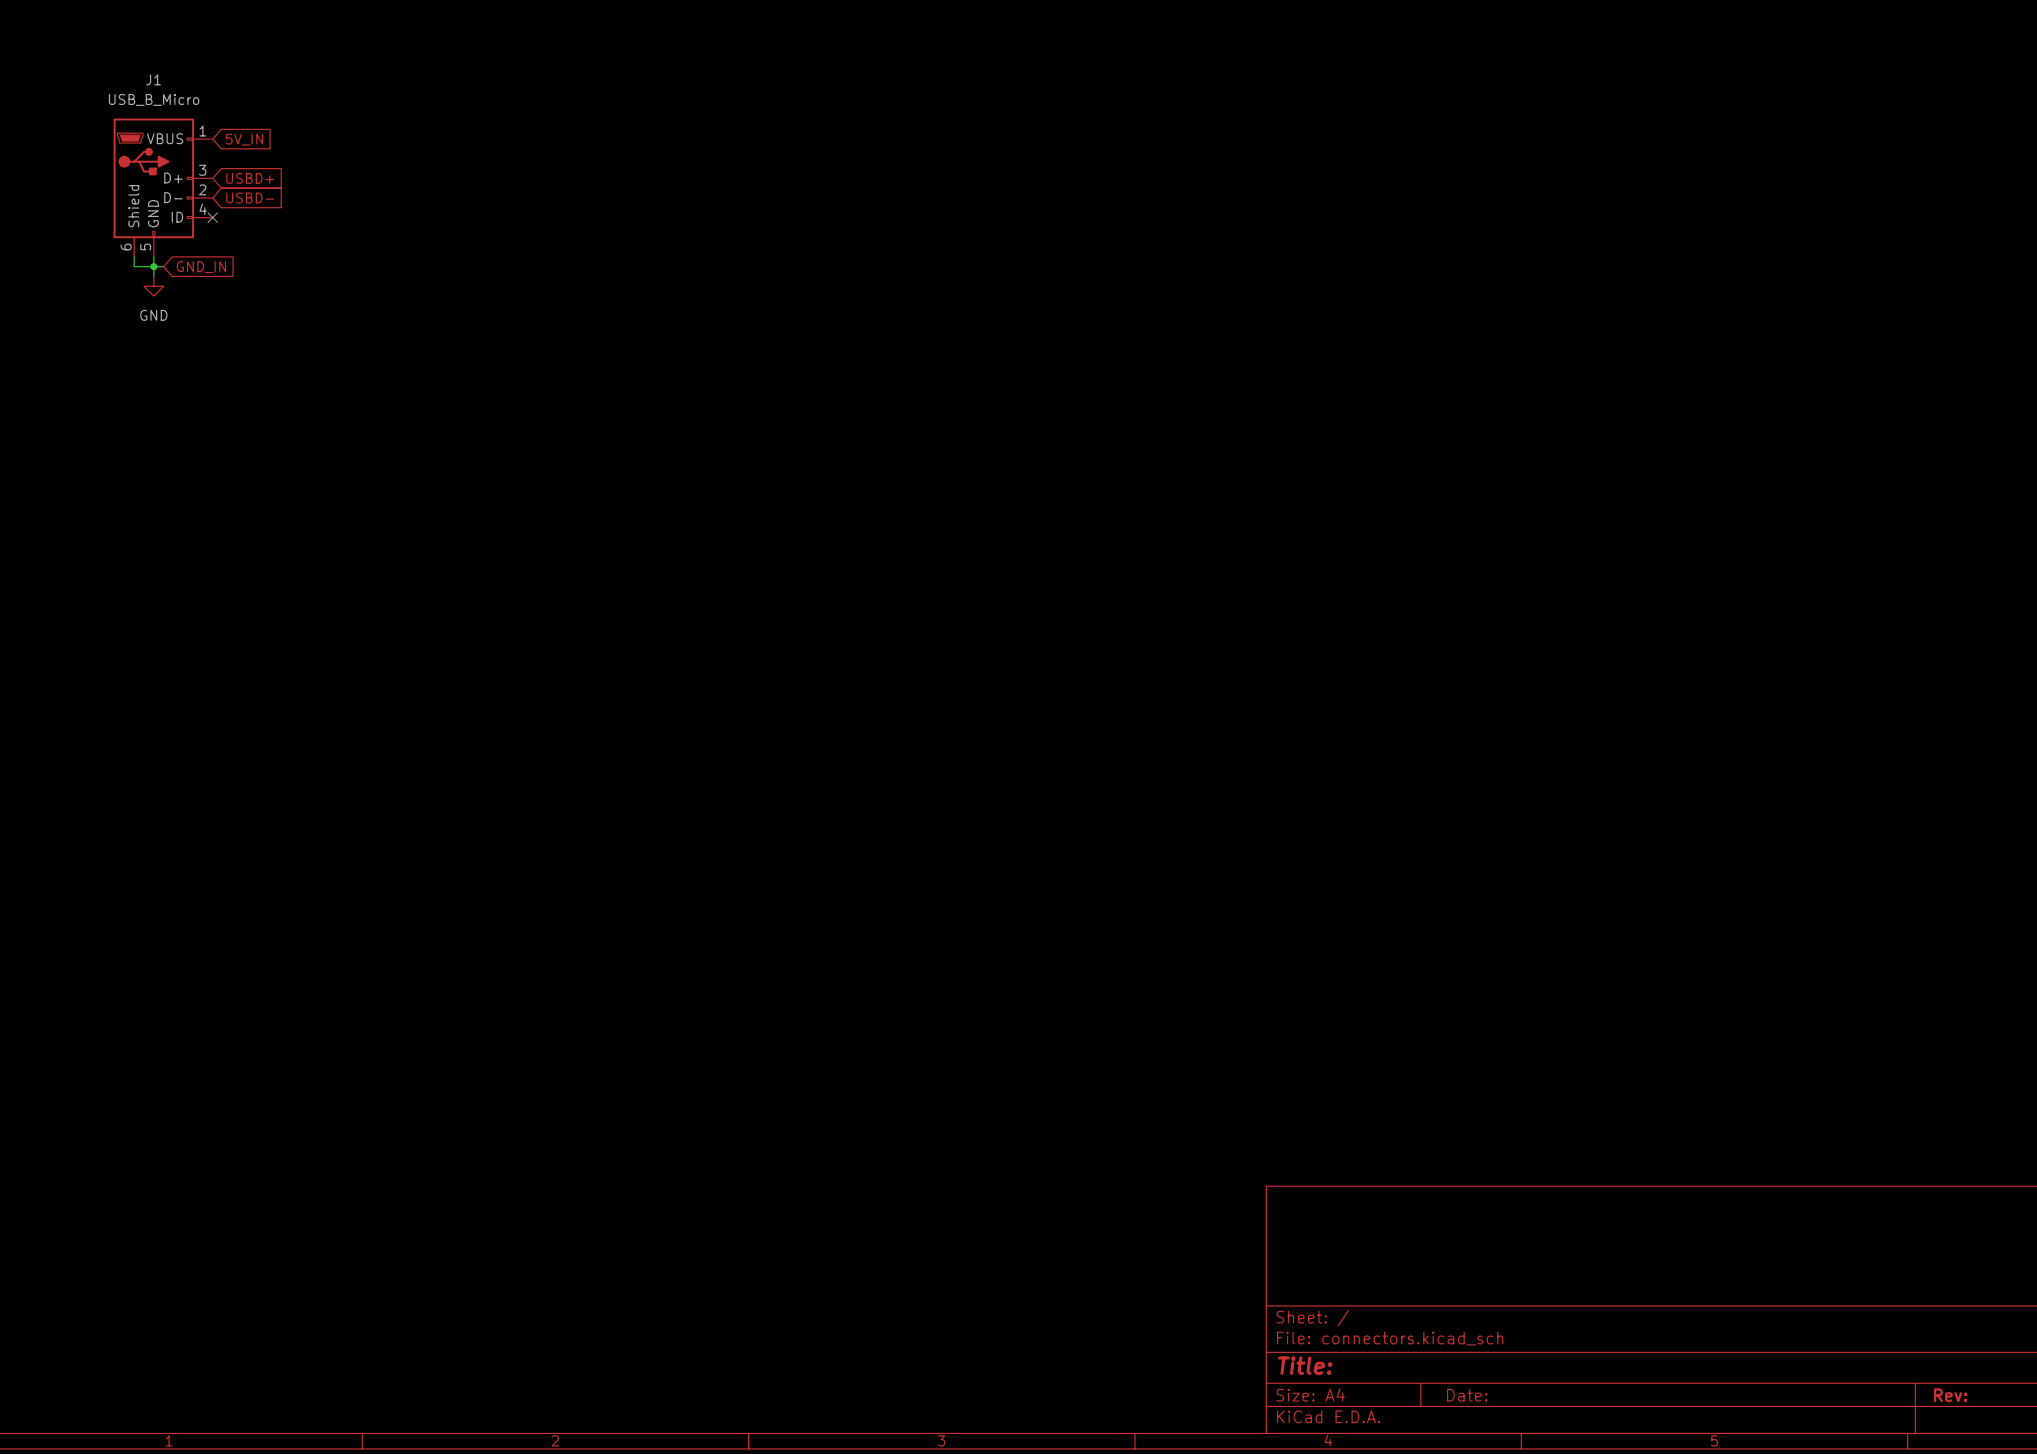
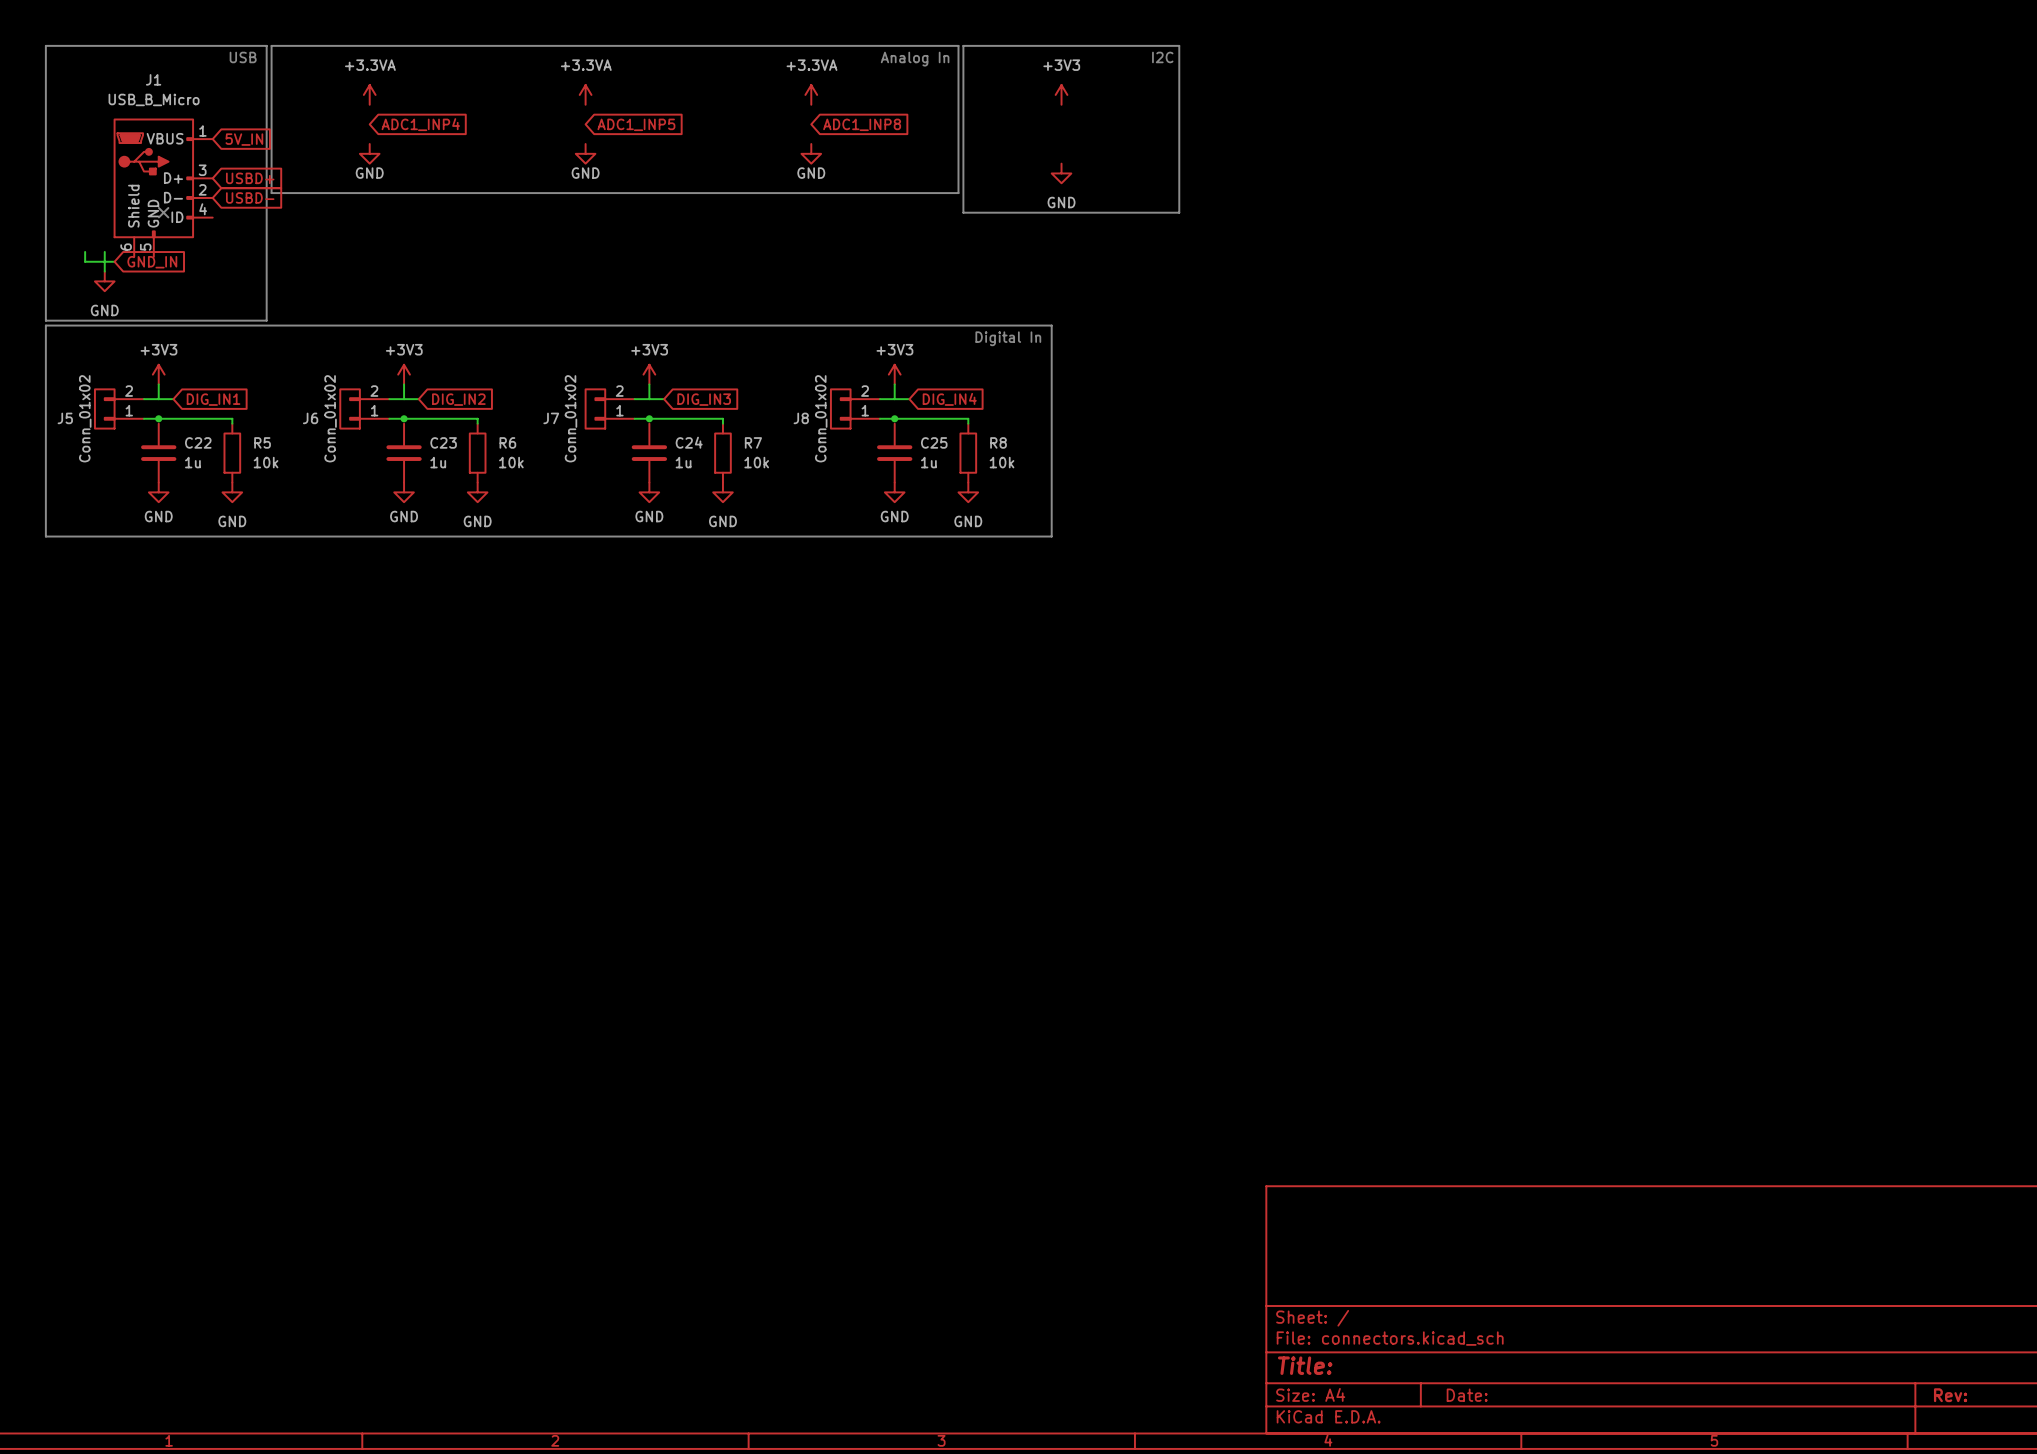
line: none -> (45, 45) (266, 45) (266, 320) (45, 320) (45, 45)
line: none -> (271, 45) (958, 45) (958, 193) (271, 193) (271, 45)
line: none -> (963, 45) (1179, 45) (1179, 212) (963, 212) (963, 45)
text: none -> USB (243, 57)
text: none -> I2C (1162, 57)
text: none -> Analog In (915, 59)
power symbol: none -> +3.3VA (369, 94)
power symbol: none -> +3.3VA (585, 94)
power symbol: none -> +3.3VA (811, 94)
power symbol: none -> +3V3 (1061, 94)
global label: none -> ADC1_INP4 (420, 124)
global label: none -> ADC1_INP5 (636, 124)
global label: none -> ADC1_INP8 (862, 124)
power symbol: none -> GND (369, 153)
power symbol: none -> GND (585, 153)
power symbol: none -> GND (811, 153)
power symbol: none -> GND (1061, 173)
no-connect mark: none -> (163, 212)
no-connect mark: (212, 217) -> none
wire: (134, 256) (134, 266) (163, 266) -> (85, 251) (85, 261) (114, 261)
wire: (153, 256) (153, 276) -> (104, 251) (104, 271)
junction: (153, 266) -> none
global label position: GND_IN (201, 267) -> GND_IN (152, 262)
power symbol position: GND (153, 286) -> GND (104, 281)
line: none -> (45, 325) (1051, 325) (1051, 536) (45, 536) (45, 325)
text: none -> Digital In (1008, 338)
power symbol: none -> +3V3 (158, 374)
power symbol: none -> +3V3 (404, 374)
power symbol: none -> +3V3 (649, 374)
power symbol: none -> +3V3 (894, 374)
wire: none -> (158, 384) (158, 399)
wire: none -> (404, 384) (404, 399)
wire: none -> (649, 384) (649, 399)
wire: none -> (894, 384) (894, 399)
wire: none -> (144, 399) (173, 399)
global label: none -> DIG_IN1 (213, 399)
wire: none -> (389, 399) (418, 399)
global label: none -> DIG_IN2 (458, 399)
wire: none -> (634, 399) (664, 399)
global label: none -> DIG_IN3 (704, 399)
wire: none -> (879, 399) (909, 399)
global label: none -> DIG_IN4 (949, 399)
J5: none -> Conn_01x02 (118, 408)
J6: none -> Conn_01x02 (364, 408)
J7: none -> Conn_01x02 (609, 408)
J8: none -> Conn_01x02 (854, 408)
wire: none -> (144, 418) (232, 418) (232, 423)
junction: none -> (158, 418)
wire: none -> (389, 418) (477, 418) (477, 423)
junction: none -> (404, 418)
wire: none -> (634, 418) (722, 418) (722, 423)
junction: none -> (649, 418)
wire: none -> (879, 418) (968, 418) (968, 423)
junction: none -> (894, 418)
C22: none -> 1u (158, 453)
R5: none -> 10k (232, 453)
C23: none -> 1u (404, 453)
R6: none -> 10k (477, 453)
C24: none -> 1u (649, 453)
R7: none -> 10k (722, 453)
C25: none -> 1u (894, 453)
R8: none -> 10k (968, 453)
power symbol: none -> GND (158, 492)
power symbol: none -> GND (232, 492)
power symbol: none -> GND (404, 492)
power symbol: none -> GND (477, 492)
power symbol: none -> GND (649, 492)
power symbol: none -> GND (722, 492)
power symbol: none -> GND (894, 492)
power symbol: none -> GND (968, 492)

